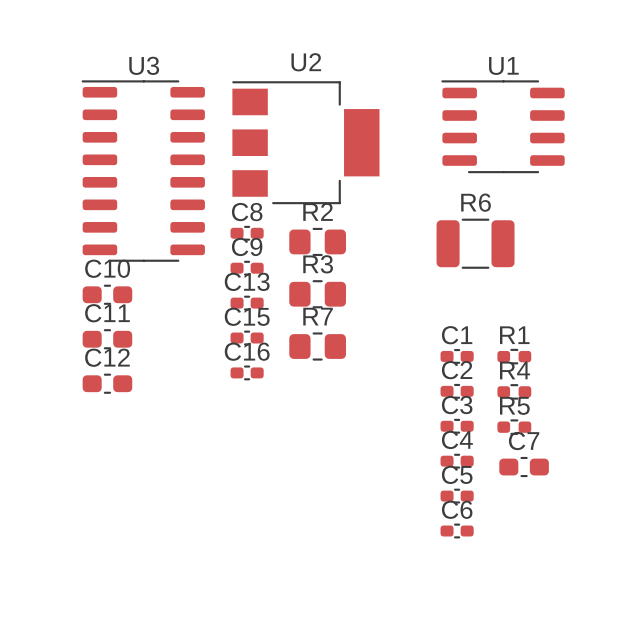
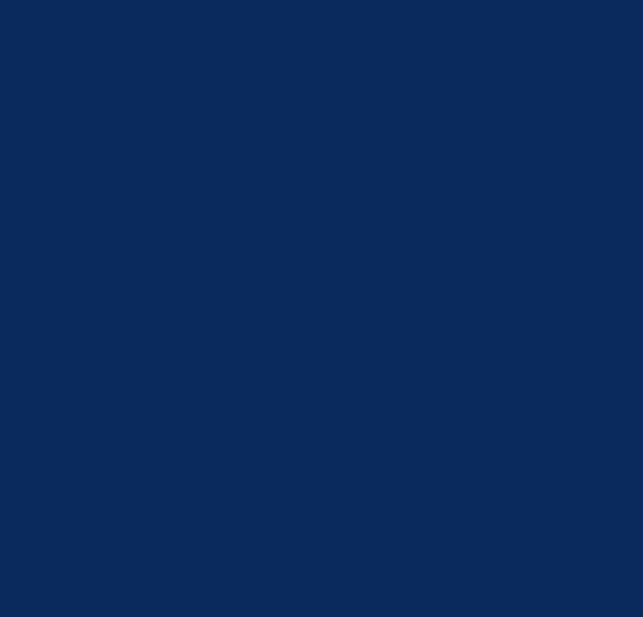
U1: (503, 126) -> none
U2: (305, 142) -> none
U3: (143, 171) -> none
C8: (247, 233) -> none
R2: (317, 241) -> none
R6: (475, 243) -> none
C9: (247, 268) -> none
C10: (107, 294) -> none
R3: (317, 294) -> none
C13: (247, 303) -> none
C15: (247, 338) -> none
C11: (107, 339) -> none
R7: (317, 346) -> none
C1: (457, 356) -> none
R1: (514, 356) -> none
C16: (247, 372) -> none
C12: (107, 383) -> none
C2: (457, 391) -> none
R4: (514, 391) -> none
C3: (457, 426) -> none
R5: (514, 427) -> none
C4: (457, 461) -> none
C7: (524, 467) -> none
C5: (457, 496) -> none
C6: (457, 530) -> none

